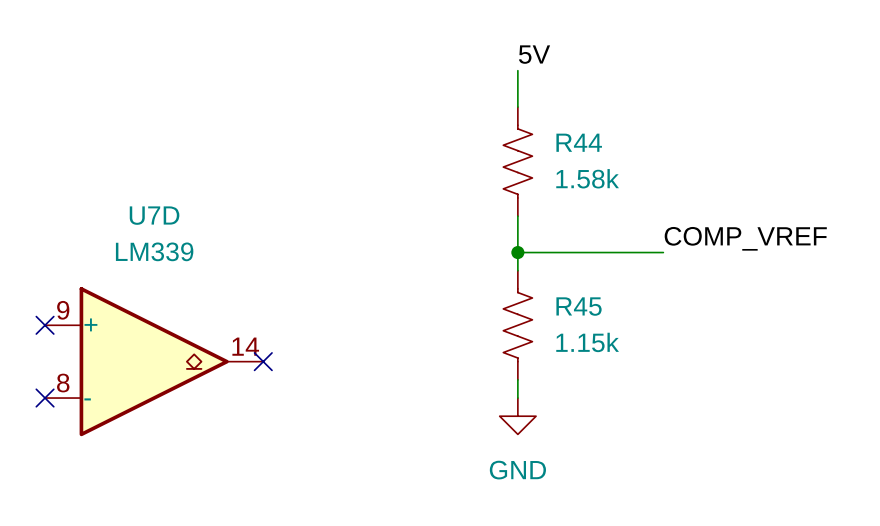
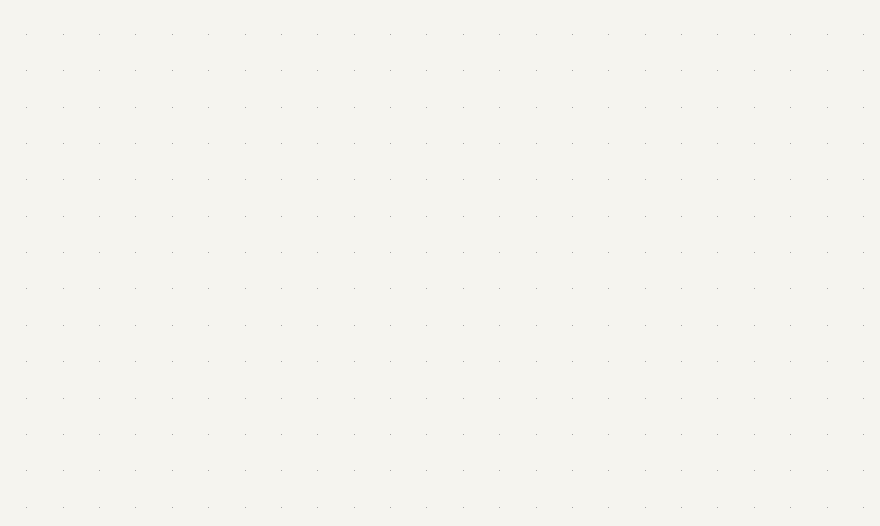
label: 5V (534, 54) -> none
wire: (517, 70) (517, 107) -> none
R44: 1.58k (517, 161) -> none
wire: (517, 216) (517, 270) -> none
label: COMP_VREF (745, 238) -> none
wire: (517, 252) (663, 252) -> none
junction: (517, 252) -> none
no-connect mark: (45, 325) -> none
R45: 1.15k (517, 325) -> none
U7D: LM339 (154, 361) -> none
no-connect mark: (263, 361) -> none
wire: (517, 379) (517, 398) -> none
no-connect mark: (45, 398) -> none
power symbol: GND (517, 416) -> none

